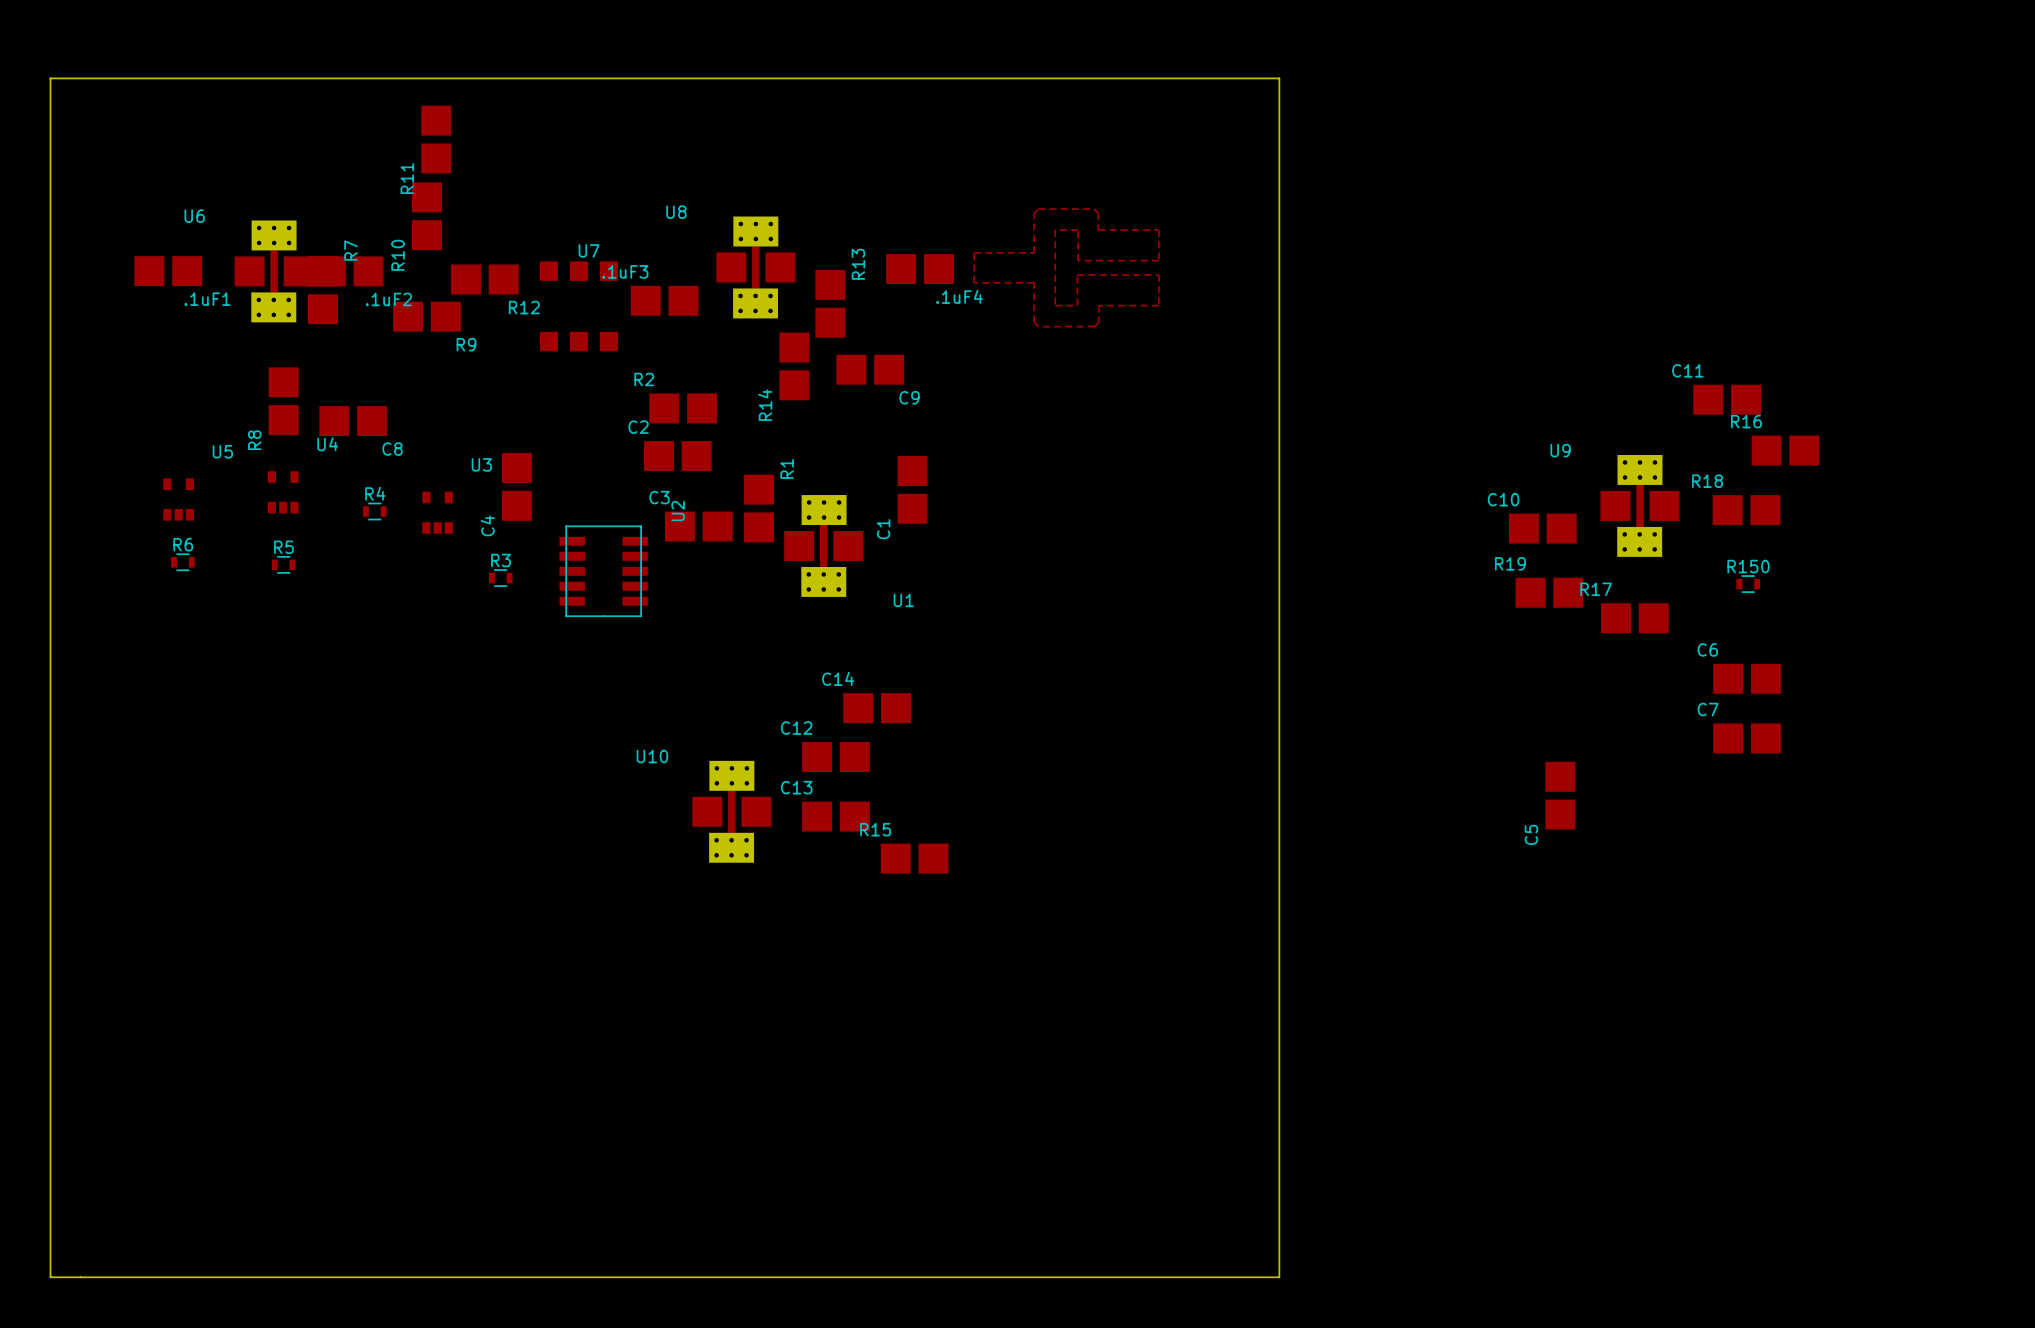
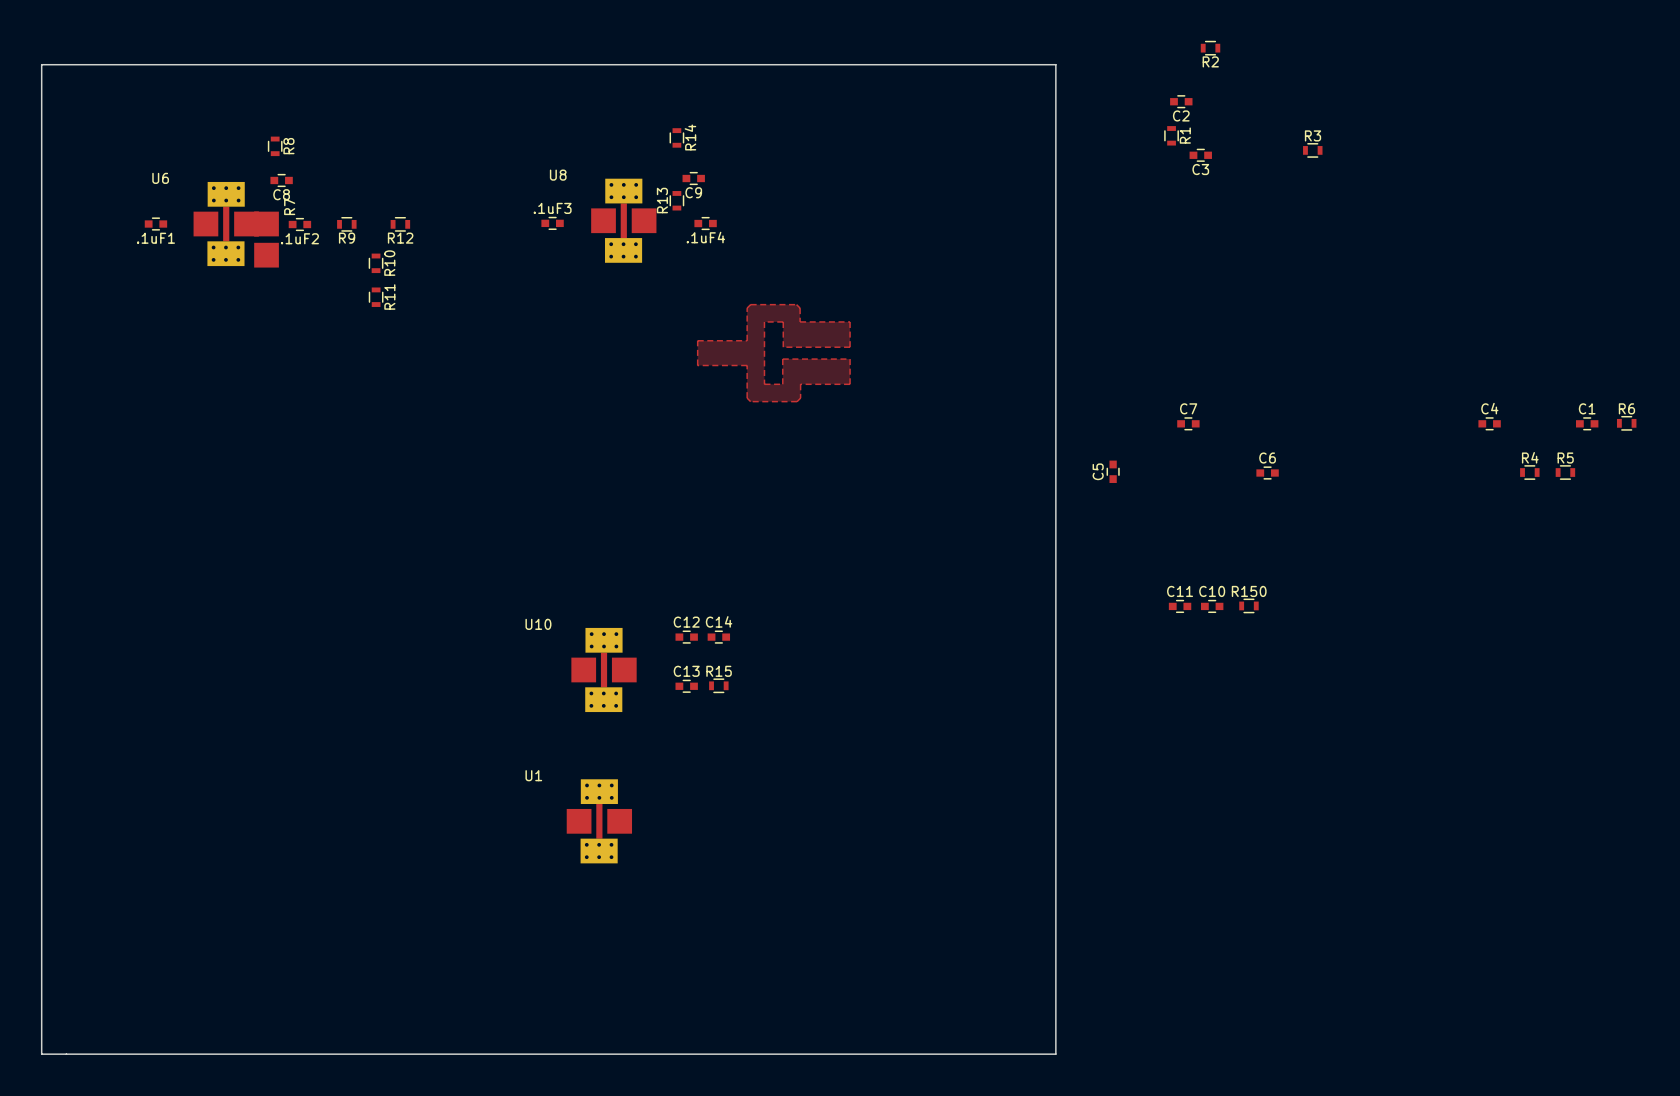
R11 footprint: [421, 105, 452, 174] -> [368, 287, 384, 307]
R11 name position: R11 (407, 178) -> R11 (389, 297)
R10 footprint: [411, 182, 442, 251] -> [368, 253, 384, 274]
top zone outline: (1038, 209) (1034, 213) (1034, 252) (974, 252) (974, 282) (1034, 282) (1034, 322) (1038, 326) (1094, 326) (1098, 322) (1098, 305) (1158, 305) (1158, 275) (1077, 275) (1077, 305) (1055, 305) (1055, 230) (1077, 230) (1077, 260) (1158, 260) (1158, 230) (1098, 230) (1098, 213) (1094, 209) (1038, 209) -> (750, 304) (747, 308) (747, 340) (697, 340) (697, 365) (747, 365) (747, 398) (750, 401) (797, 401) (800, 398) (800, 384) (850, 384) (850, 359) (782, 359) (782, 384) (764, 384) (764, 321) (783, 321) (783, 347) (850, 347) (850, 321) (800, 321) (800, 308) (796, 304) (750, 304)
.1uF4 footprint: [886, 254, 954, 285] -> [694, 217, 717, 230]
R10 name position: R10 (398, 255) -> R10 (389, 263)
.1uF1 footprint: [134, 256, 203, 287] -> [144, 217, 168, 231]
.1uF2 footprint: [315, 256, 384, 287] -> [288, 218, 312, 231]
R12 footprint: [450, 264, 519, 295] -> [390, 217, 411, 232]
R13 name position: R13 (858, 264) -> R13 (662, 200)
R13 footprint: [815, 269, 846, 338] -> [669, 191, 685, 211]
.1uF3 name position: .1uF3 (625, 271) -> .1uF3 (552, 208)
.1uF3 footprint: [630, 285, 699, 316] -> [541, 216, 564, 230]
.1uF4 name position: .1uF4 (959, 296) -> .1uF4 (705, 237)
.1uF1 name position: .1uF1 (207, 299) -> .1uF1 (155, 238)
.1uF2 name position: .1uF2 (388, 299) -> .1uF2 (299, 238)
R9 footprint: [393, 301, 461, 332] -> [337, 217, 357, 232]
U7: (578, 306) -> none
R12 name position: R12 (524, 307) -> R12 (400, 238)
R14 footprint: [779, 332, 810, 401] -> [669, 128, 685, 148]
R9 name position: R9 (466, 344) -> R9 (347, 238)
C9 footprint: [836, 354, 905, 385] -> [682, 172, 705, 185]
R8 footprint: [268, 367, 299, 436] -> [267, 136, 283, 157]
C11 name position: C11 (1687, 370) -> C11 (1180, 591)
R2 name position: R2 (644, 379) -> R2 (1210, 61)
C11 footprint: [1693, 384, 1762, 415] -> [1168, 600, 1192, 613]
R2 footprint: [649, 393, 718, 424] -> [1200, 40, 1221, 56]
C9 name position: C9 (909, 397) -> C9 (693, 192)
R14 name position: R14 (765, 405) -> R14 (690, 137)
C8 footprint: [319, 406, 388, 436] -> [270, 174, 293, 187]
C2 name position: C2 (638, 427) -> C2 (1181, 115)
R8 name position: R8 (254, 440) -> R8 (288, 146)
C2 footprint: [643, 441, 712, 472] -> [1170, 95, 1193, 109]
C8 name position: C8 (392, 449) -> C8 (281, 194)
R16: (1785, 450) -> none
C4 footprint: [501, 453, 532, 521] -> [1478, 417, 1501, 431]
C1 footprint: [897, 456, 928, 524] -> [1576, 417, 1599, 431]
R1 name position: R1 (787, 468) -> R1 (1185, 135)
R1 footprint: [744, 474, 775, 543] -> [1164, 126, 1179, 146]
U4: (283, 492) -> none
C3 name position: C3 (659, 497) -> C3 (1200, 169)
U5: (178, 499) -> none
C10 name position: C10 (1503, 499) -> C10 (1212, 591)
U9: (1640, 505) -> none
R18: (1746, 510) -> none
R4 position: (374, 511) -> (1529, 472)
C3 footprint: [664, 511, 733, 542] -> [1189, 148, 1212, 162]
U3: (437, 512) -> none
C10 footprint: [1508, 513, 1577, 544] -> [1200, 600, 1224, 613]
C4 name position: C4 (487, 525) -> C4 (1489, 408)
C1 name position: C1 (883, 529) -> C1 (1587, 408)
U1 rotation: 0° (823, 545) -> 180° (599, 821)
U1 position: (823, 545) -> (599, 821)
R6 position: (182, 562) -> (1626, 423)
R5 position: (283, 564) -> (1565, 472)
U2: (603, 571) -> none
R3 position: (500, 578) -> (1312, 150)
R150 position: (1748, 584) -> (1248, 605)
R19: (1549, 592) -> none
R17: (1634, 618) -> none
C6 name position: C6 (1707, 649) -> C6 (1267, 458)
C6 footprint: [1713, 663, 1781, 694] -> [1256, 466, 1279, 480]
C14 name position: C14 (838, 678) -> C14 (719, 621)
C14 footprint: [843, 693, 912, 724] -> [707, 630, 731, 644]
C7 name position: C7 (1708, 709) -> C7 (1188, 408)
C7 footprint: [1713, 723, 1781, 754] -> [1177, 417, 1200, 431]
C12 name position: C12 (796, 728) -> C12 (686, 622)
C12 footprint: [802, 741, 870, 772] -> [675, 630, 698, 644]
C5 footprint: [1545, 761, 1576, 830] -> [1106, 460, 1120, 483]
C13 name position: C13 (796, 787) -> C13 (686, 671)
C13 footprint: [802, 801, 870, 832] -> [675, 679, 698, 693]
R15 name position: R15 (875, 829) -> R15 (719, 671)
C5 name position: C5 (1531, 834) -> C5 (1098, 471)
R15 footprint: [880, 843, 949, 874] -> [709, 678, 729, 694]

